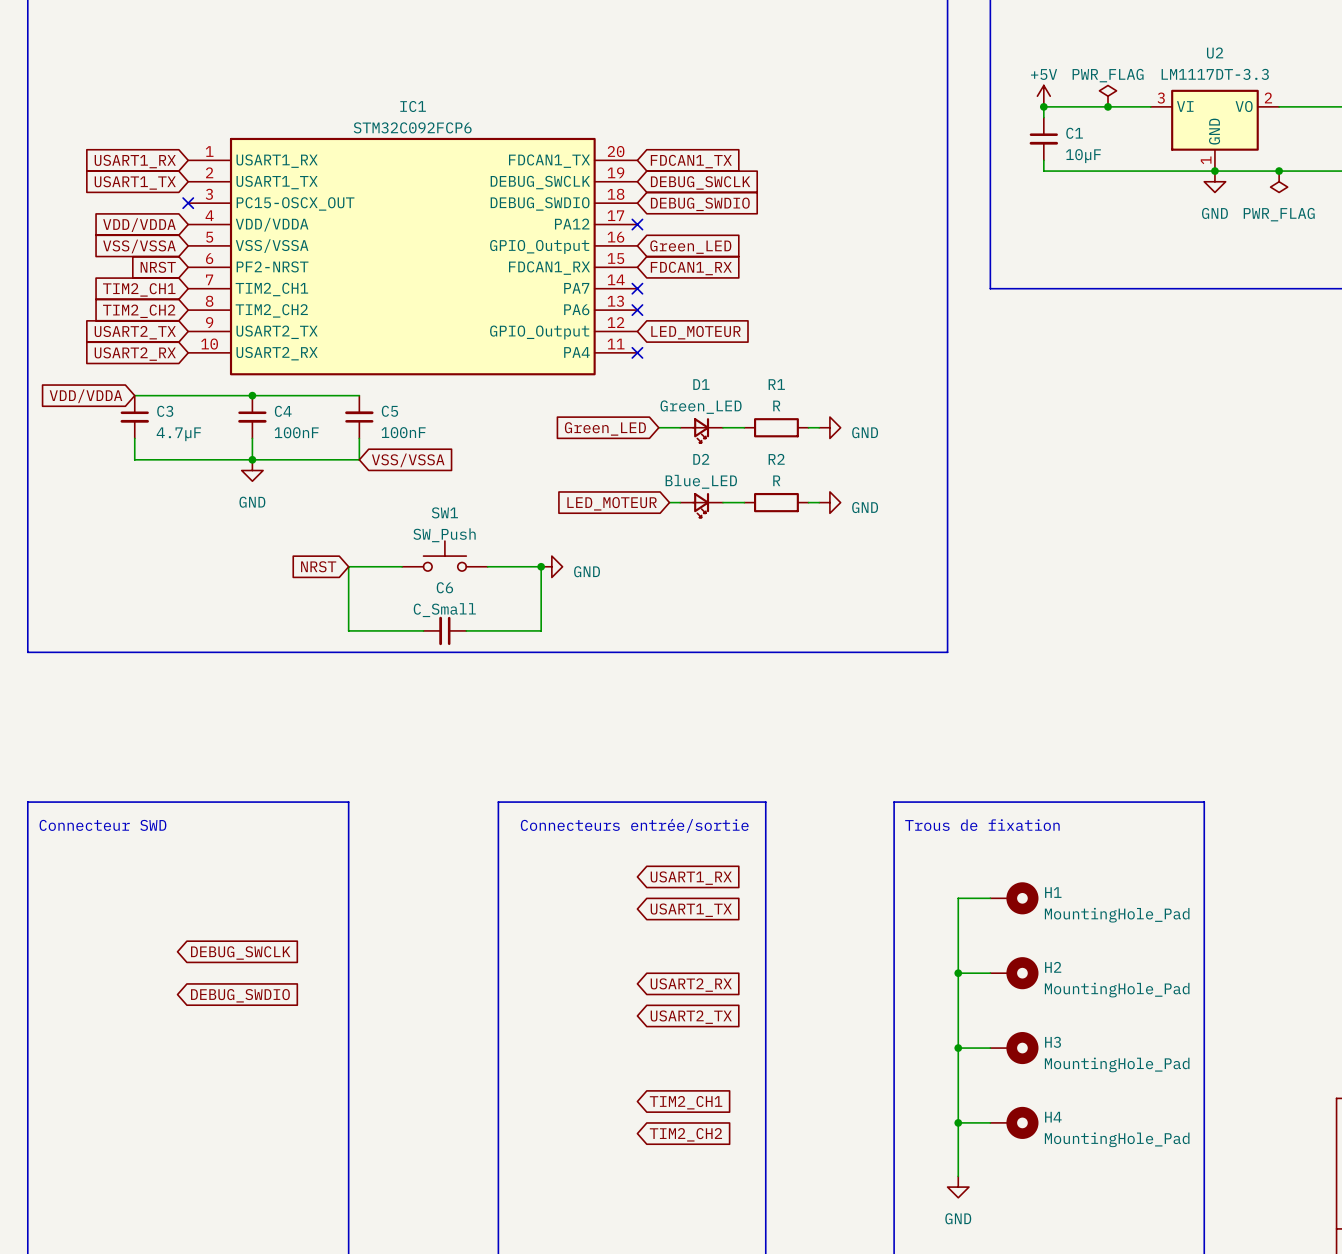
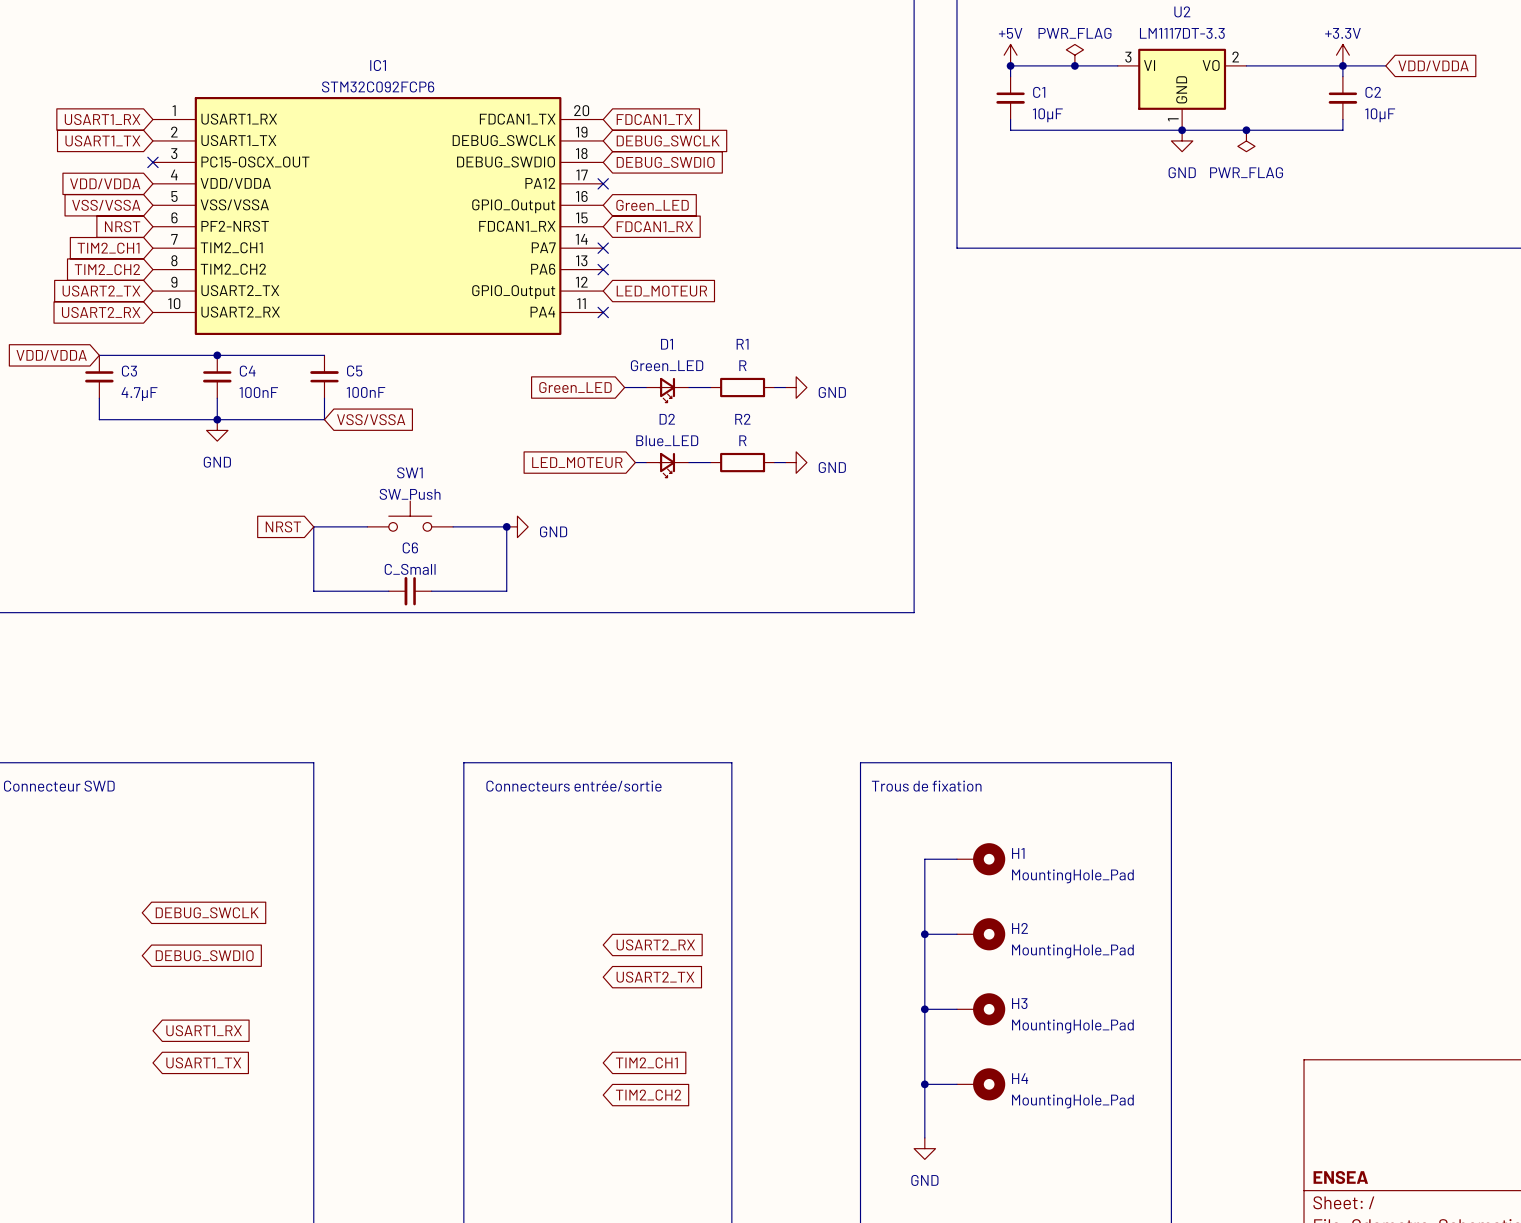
global label: USART1_RX (691, 878) -> none
global label: USART1_TX (691, 910) -> none
global label: none -> USART1_RX (204, 1030)
global label: none -> USART1_TX (203, 1062)

